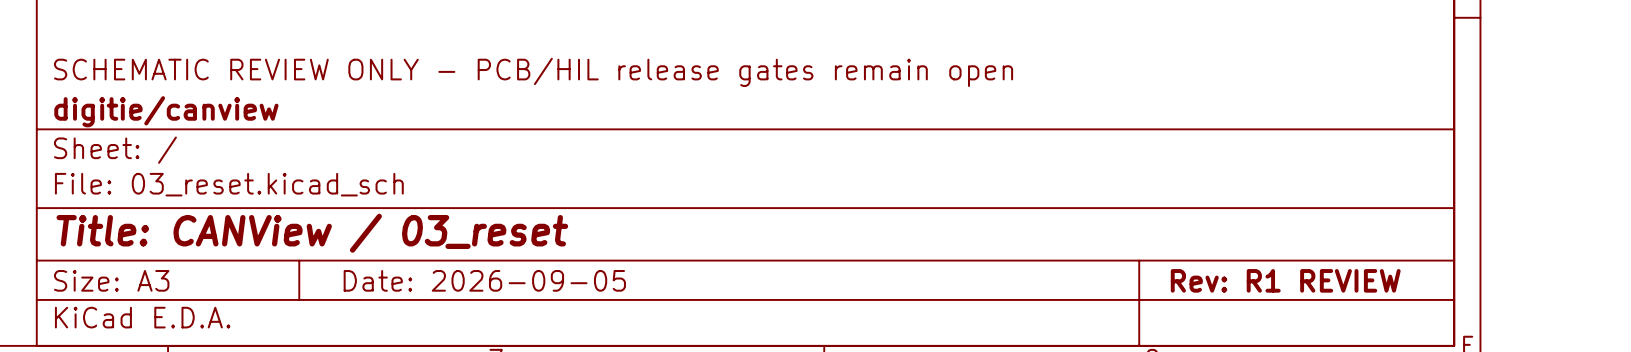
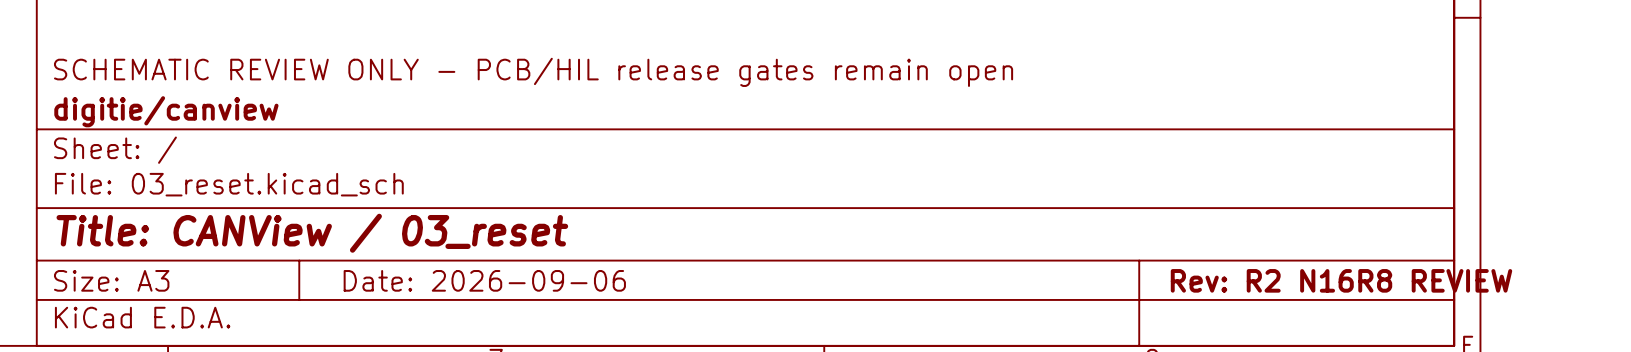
title block: Date: 2026-09-05 (484, 280) -> Date: 2026-09-06 (484, 280)
title block: Rev: R1 REVIEW (1285, 280) -> Rev: R2 N16R8 REVIEW (1341, 280)

